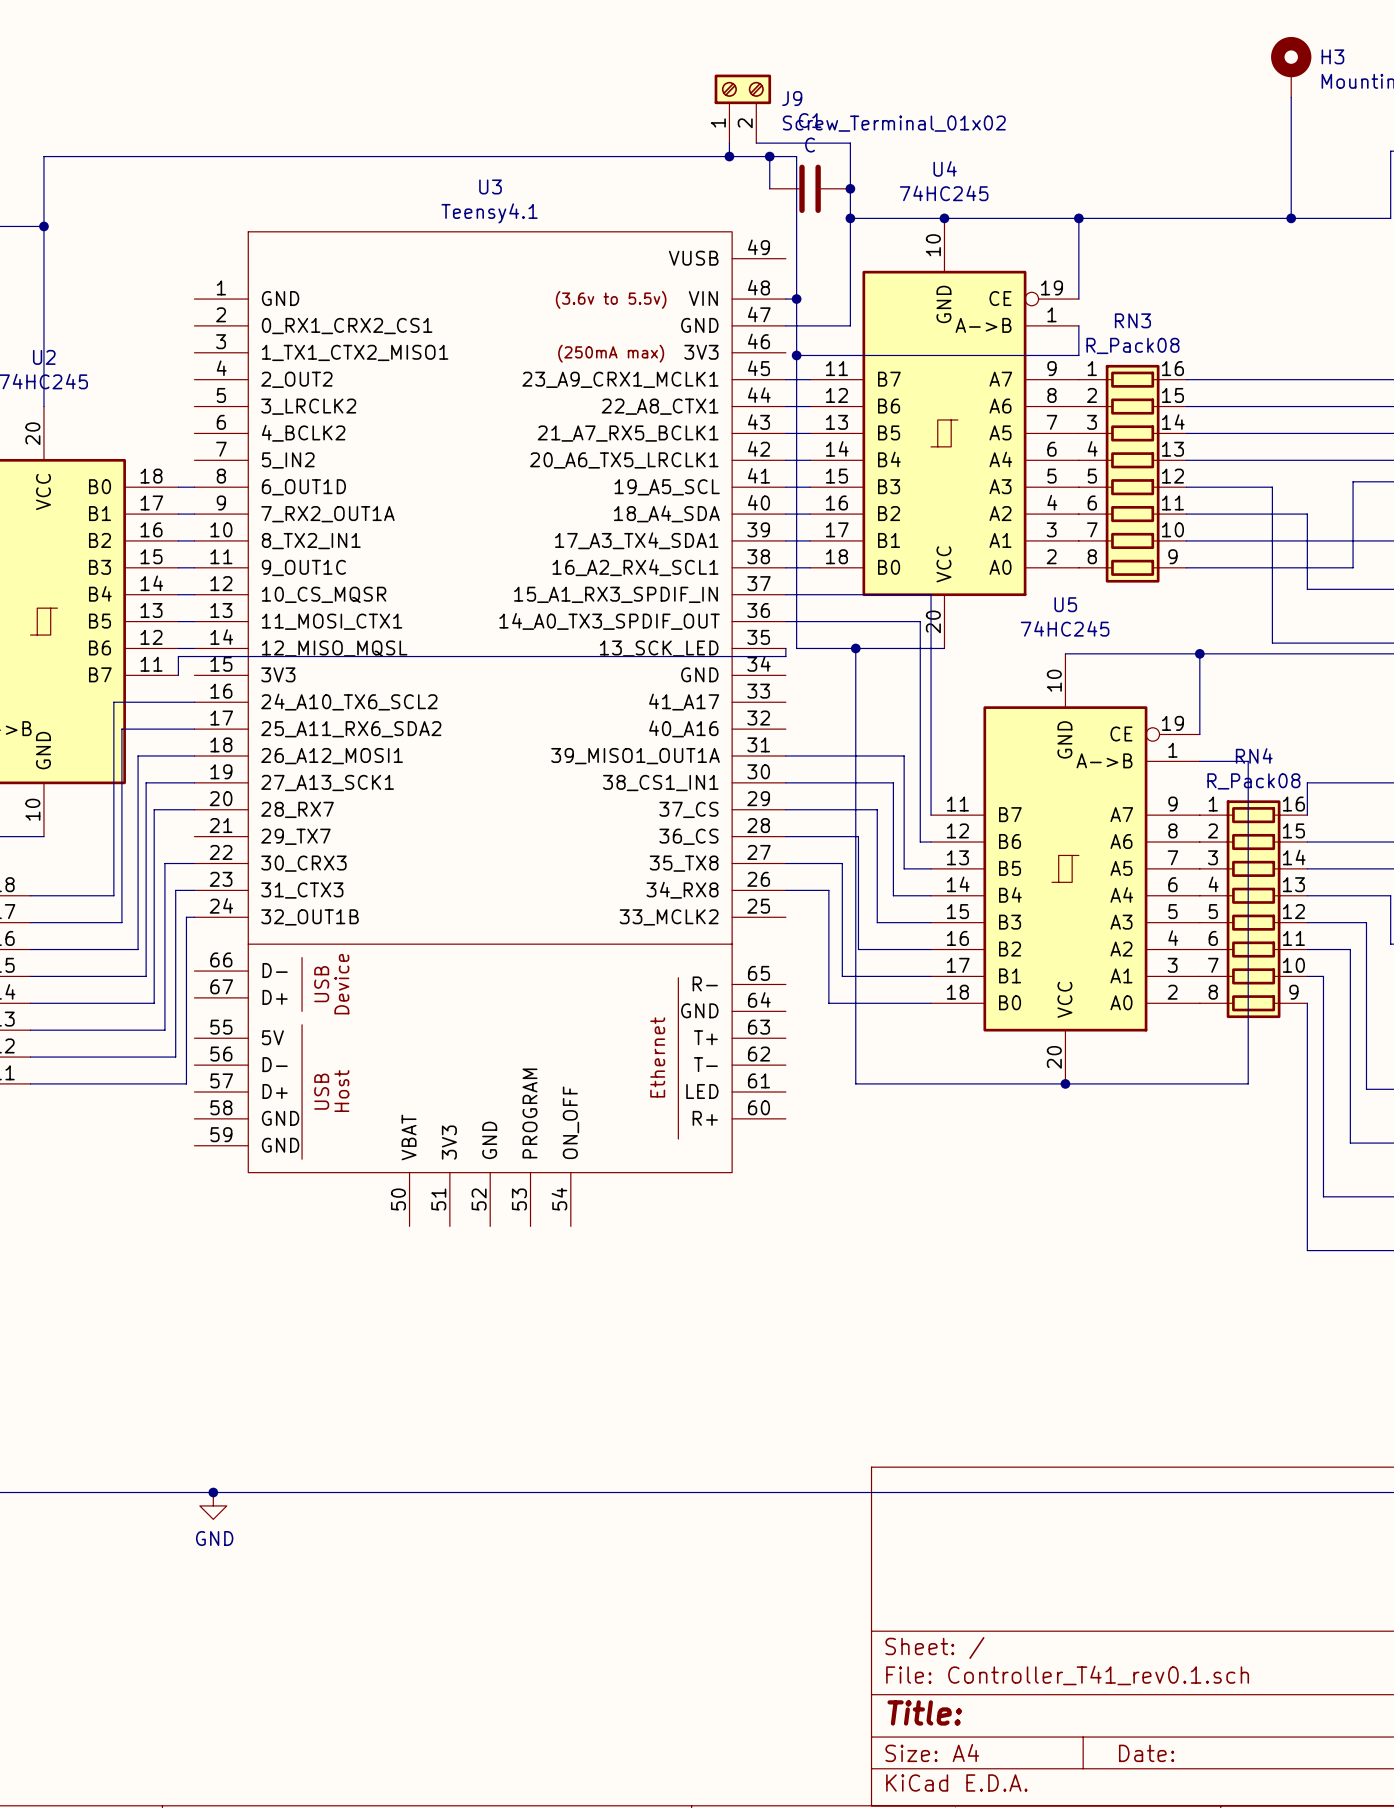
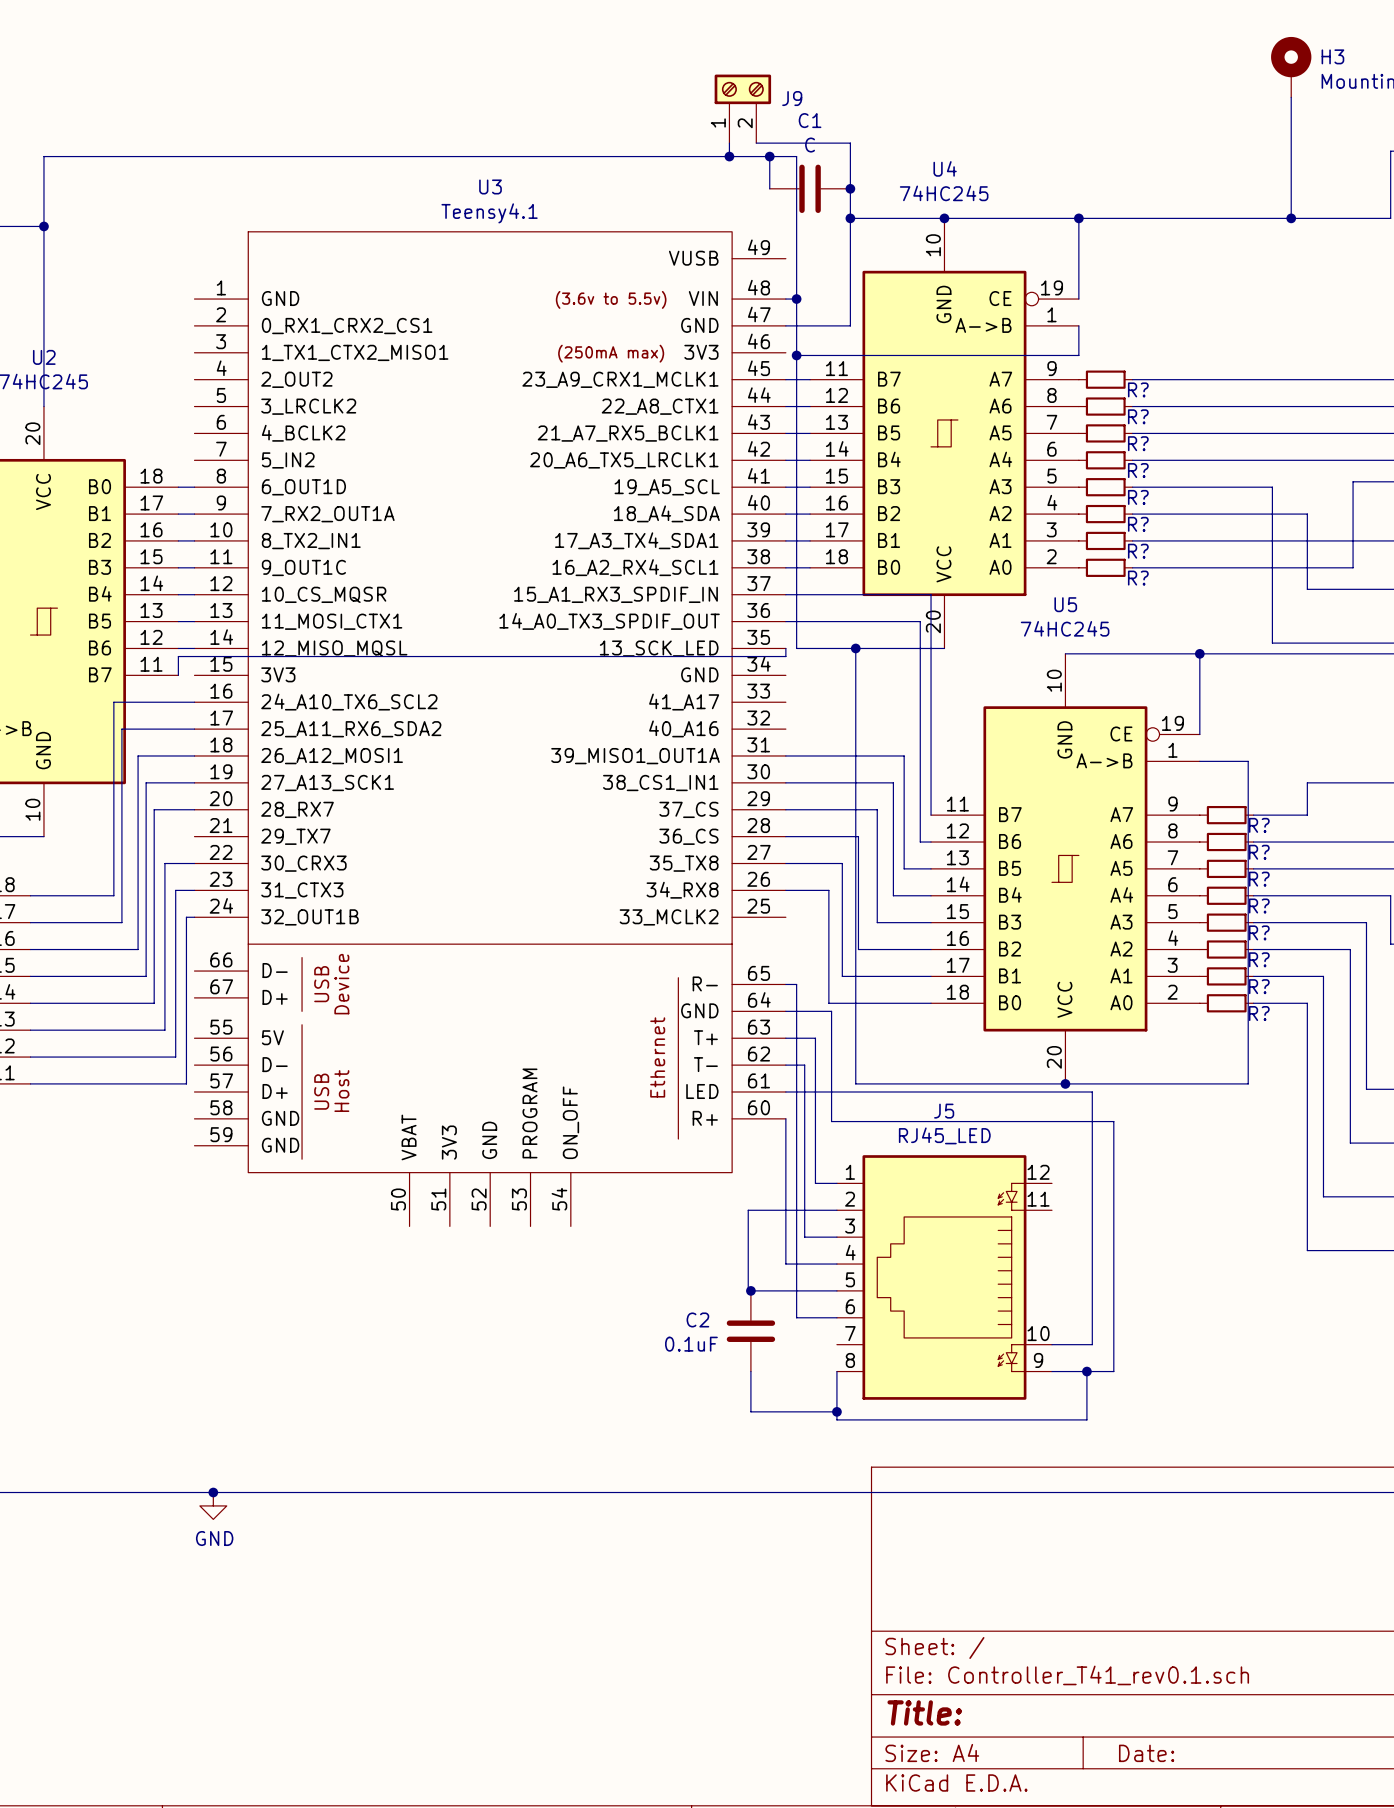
J9 value: Screw_Terminal_01x02 (894, 123) -> none
R?: none -> (1105, 379)
R?: none -> (1105, 406)
R?: none -> (1105, 433)
R?: none -> (1105, 460)
RN3: R_Pack08 (1132, 473) -> none
R?: none -> (1105, 487)
R?: none -> (1105, 514)
R?: none -> (1105, 540)
R?: none -> (1105, 567)
R?: none -> (1226, 815)
R?: none -> (1226, 842)
R?: none -> (1226, 868)
R?: none -> (1226, 895)
RN4: R_Pack08 (1253, 909) -> none
R?: none -> (1226, 922)
R?: none -> (1226, 949)
R?: none -> (1226, 976)
wire: none -> (785, 984) (796, 984) (796, 1317) (836, 1317)
R?: none -> (1226, 1003)
wire: none -> (785, 1011) (831, 1011) (831, 1121) (1113, 1121) (1113, 1371) (1051, 1371)
wire: none -> (785, 1038) (815, 1038) (815, 1183) (836, 1183)
wire: none -> (785, 1065) (804, 1065) (804, 1237) (836, 1237)
wire: none -> (785, 1091) (1092, 1091) (1092, 1344) (1051, 1344)
wire: none -> (785, 1118) (785, 1264) (836, 1264)
wire: none -> (836, 1210) (748, 1210) (748, 1290) (836, 1290)
J5: none -> RJ45_LED (944, 1277)
junction: none -> (750, 1290)
C2: none -> 0.1uF (750, 1331)
wire: none -> (750, 1371) (750, 1411) (836, 1411)
wire: none -> (836, 1371) (836, 1419) (1086, 1419) (1086, 1371)
junction: none -> (1086, 1371)
junction: none -> (836, 1411)

